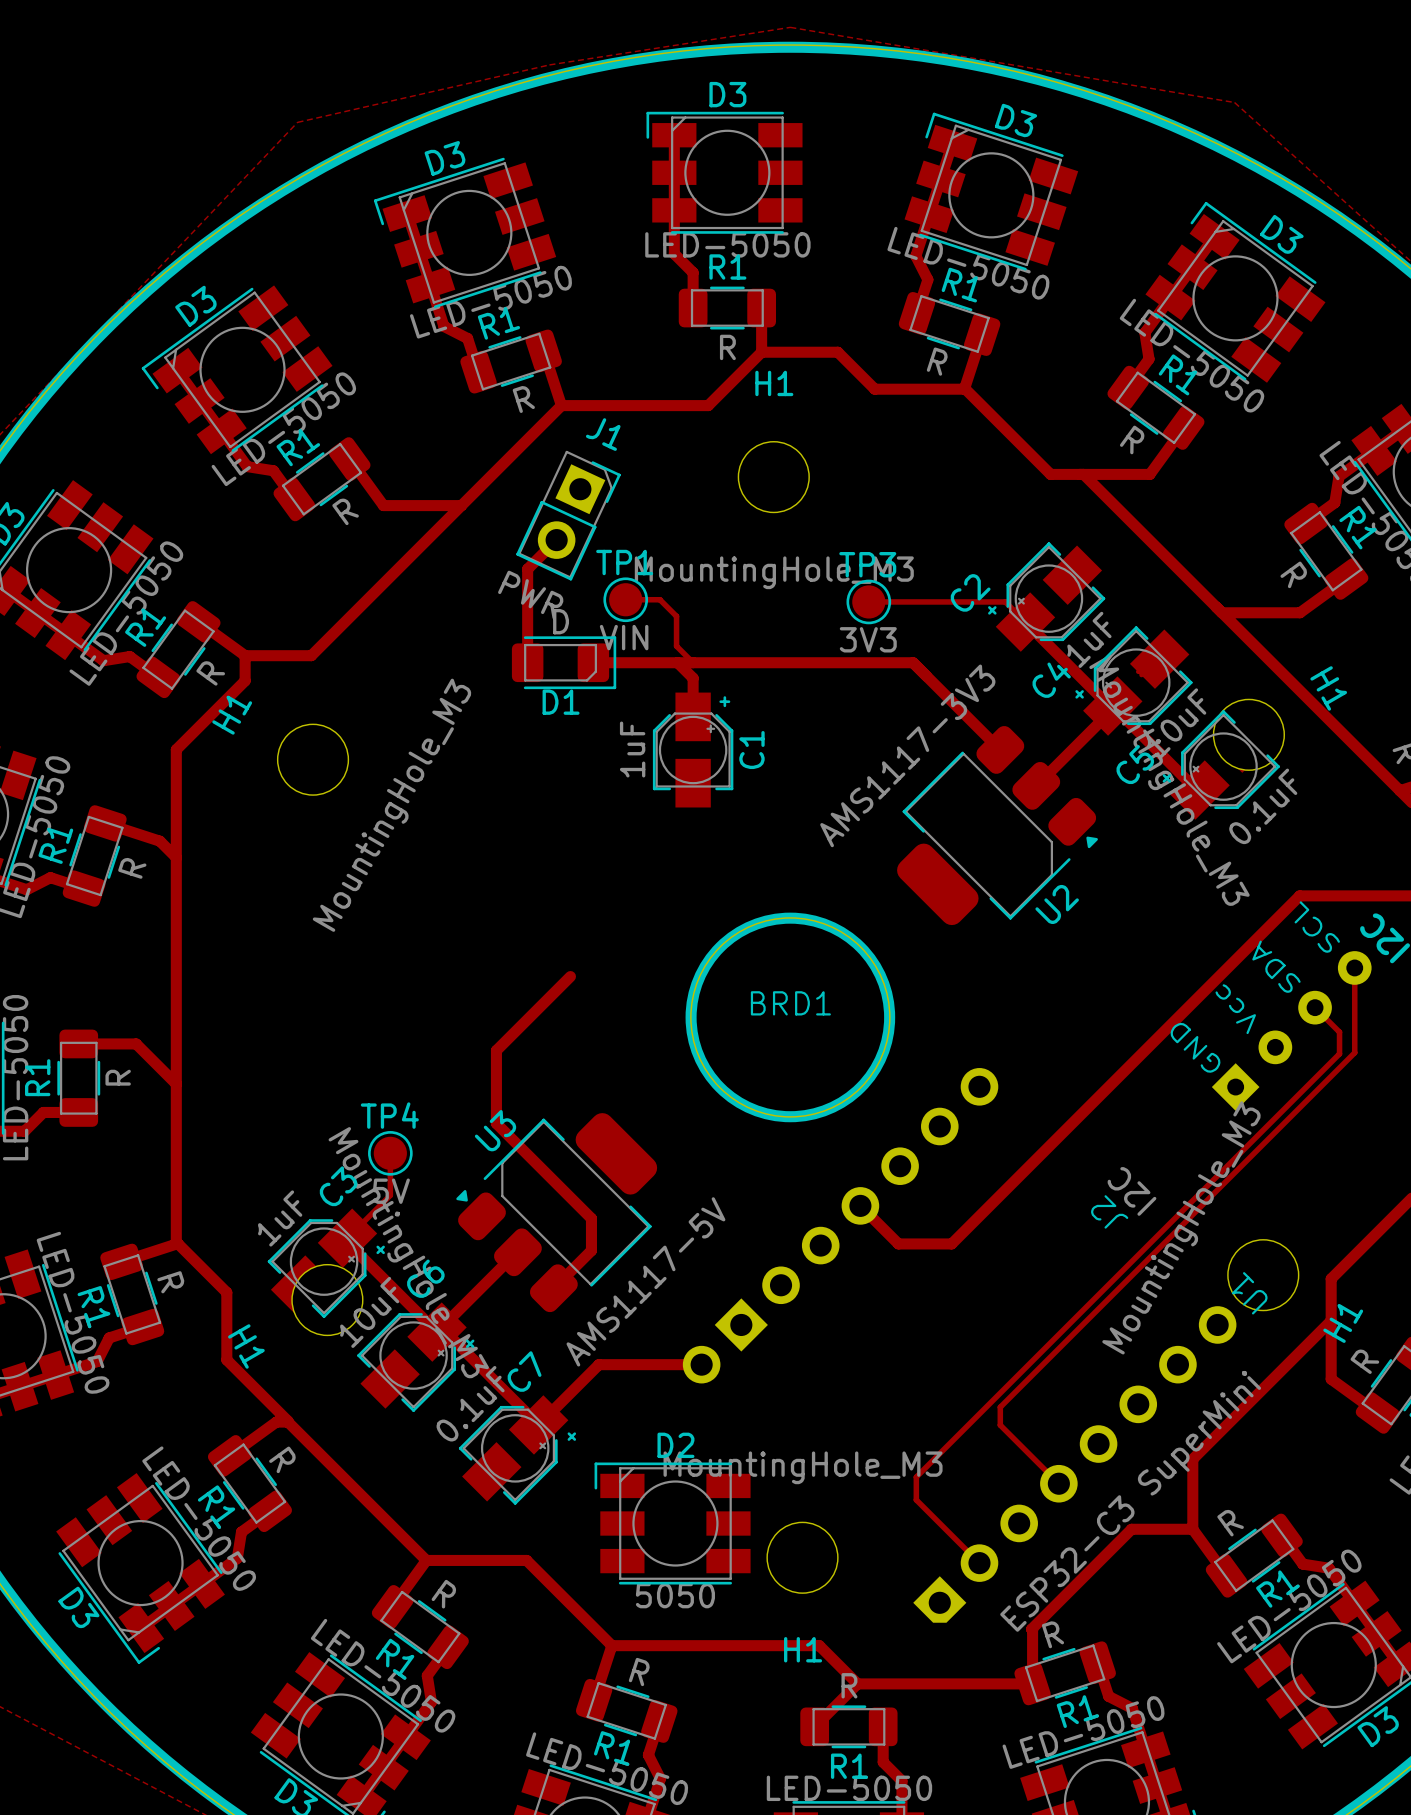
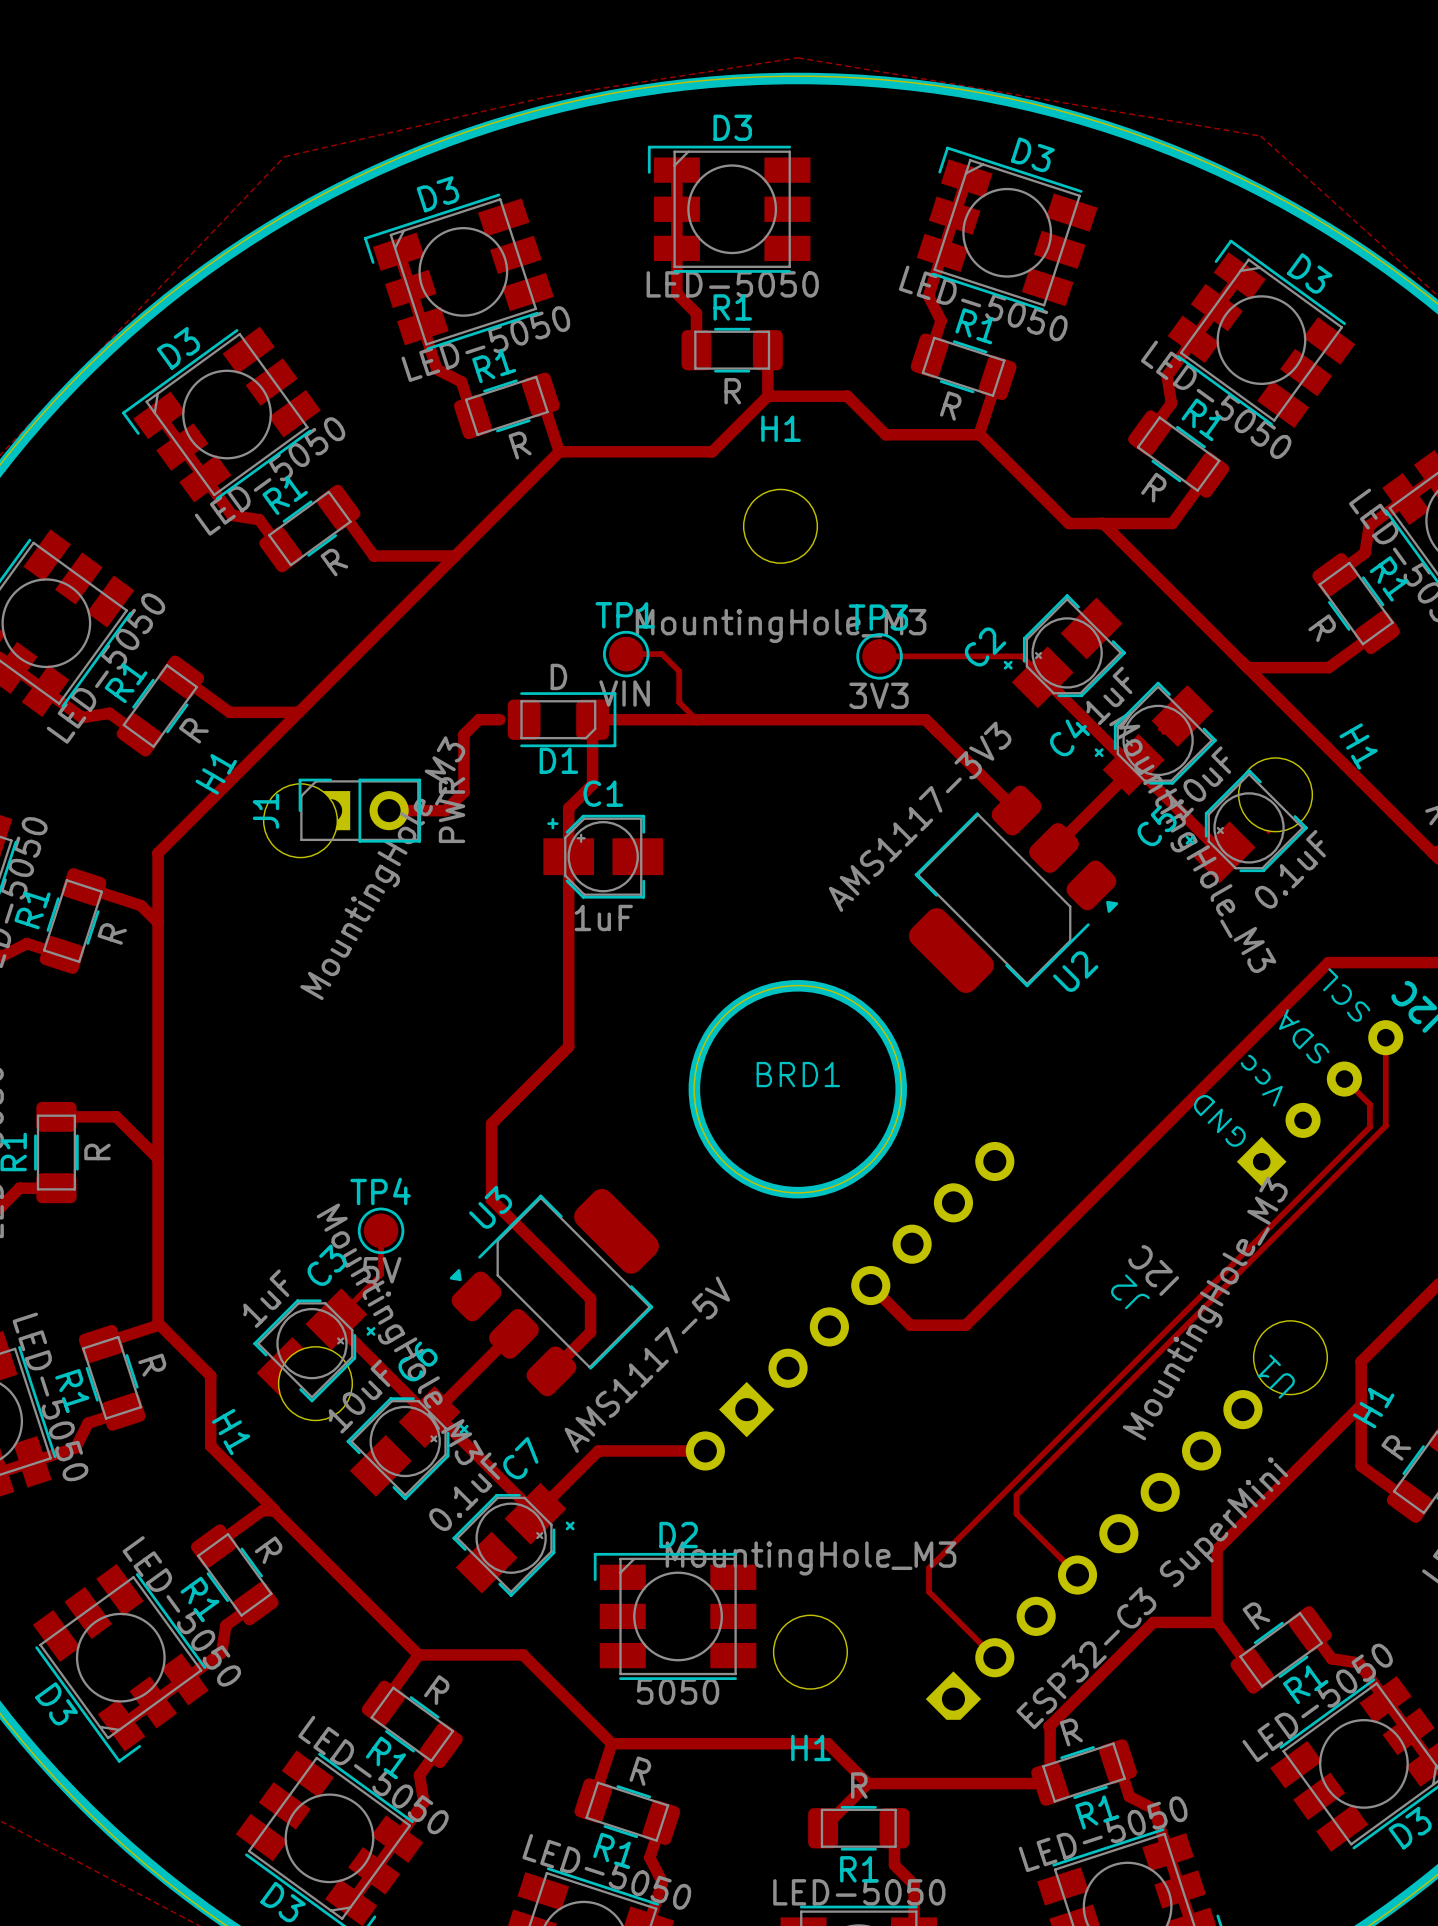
J1 rotation: 0° (568, 515) -> 115° counterclockwise (359, 810)
J1 position: (568, 515) -> (359, 810)
track: (556, 540) (527, 569) (527, 662) -> none
track: (245, 655) (245, 680) (176, 749) (176, 790) -> (298, 712) (158, 853)
track: none -> (499, 719) (478, 719) (463, 734) (463, 792) (445, 810) (389, 810)
track: none -> (592, 719) (592, 784) (568, 808) (568, 1046)
track: (677, 662) (693, 678) (693, 716) -> none
C1 rotation: 0° (693, 750) -> 90° counterclockwise (603, 856)
C1 position: (693, 750) -> (603, 856)

